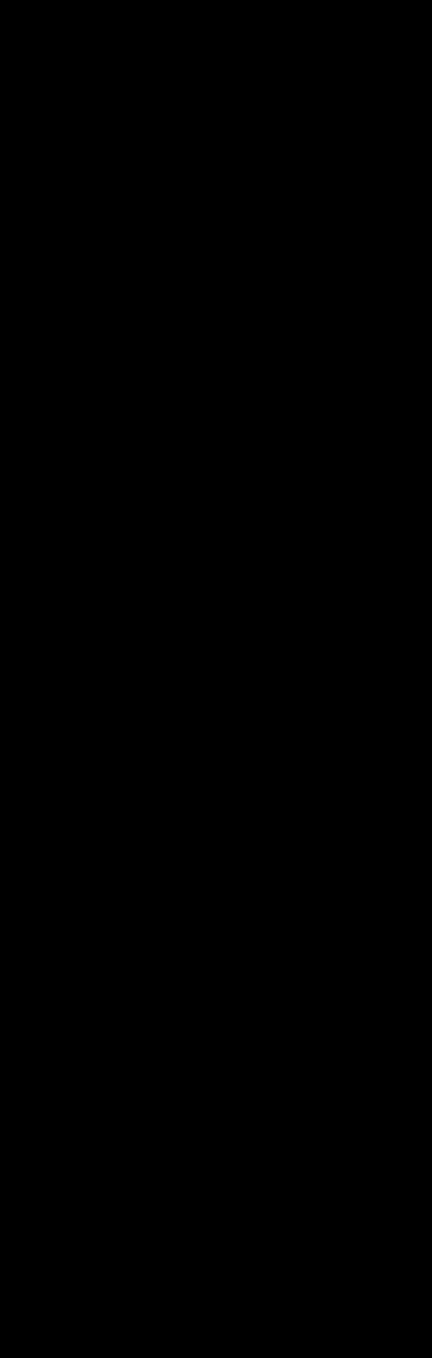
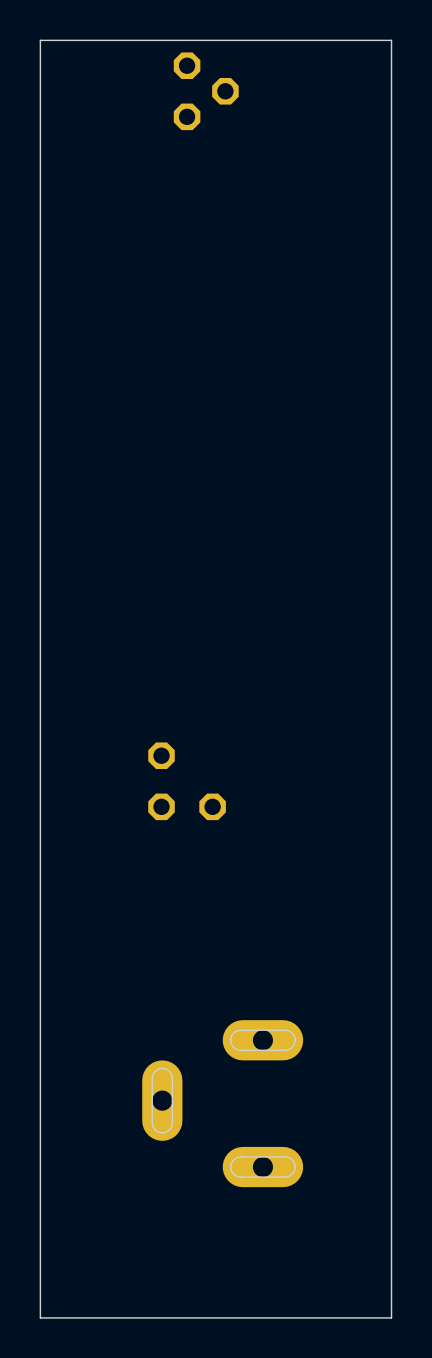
board edge: none -> (391, 40) (40, 40) (40, 1317) (391, 1317) (391, 40)
part: none -> (206, 91)
part: none -> (187, 781)
part: none -> (222, 1103)

